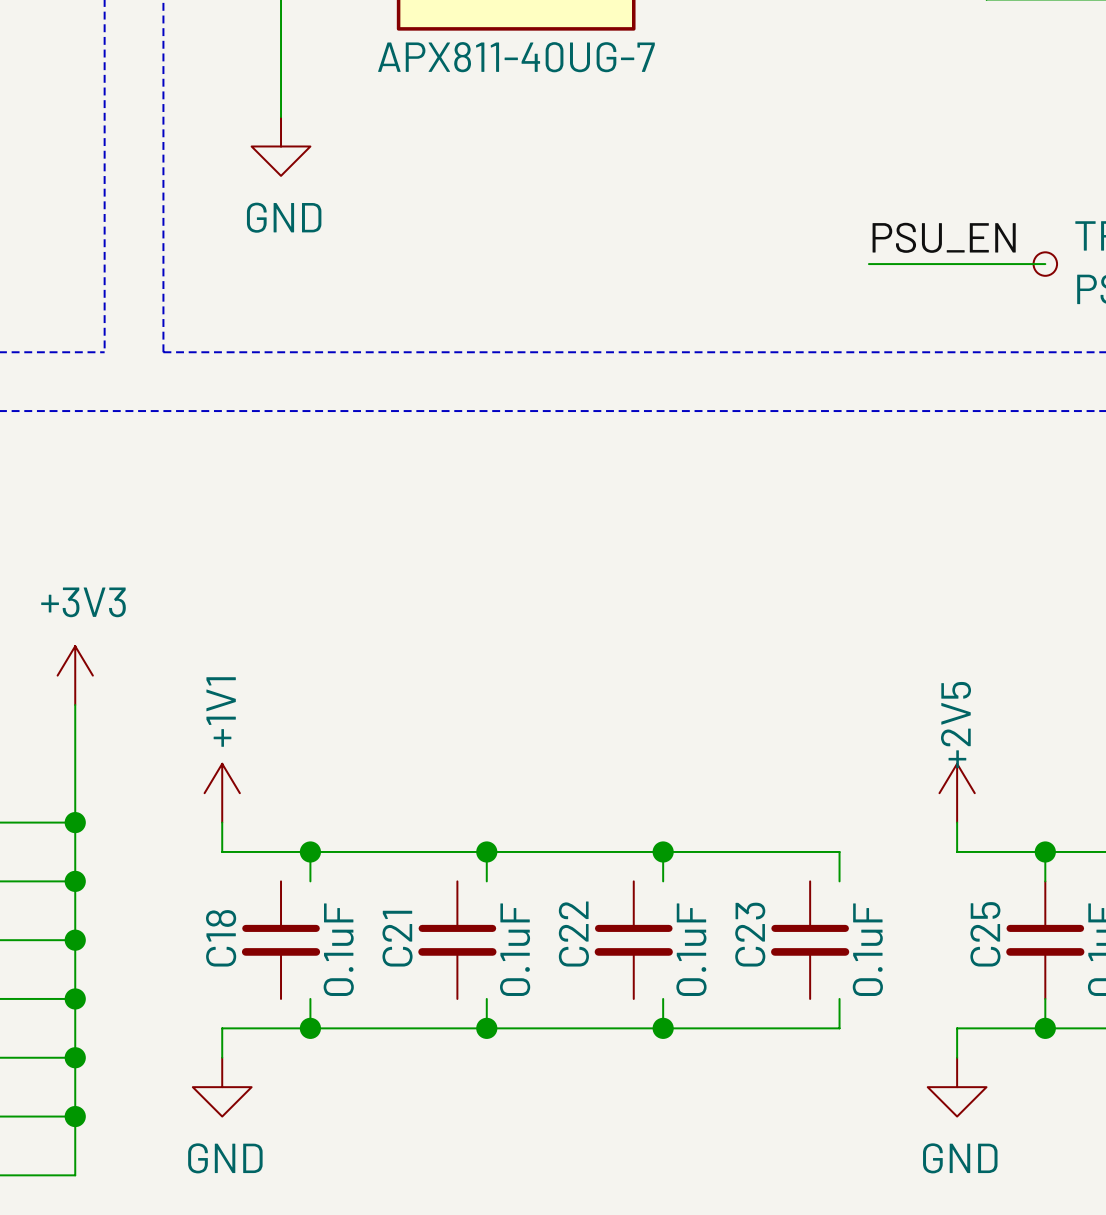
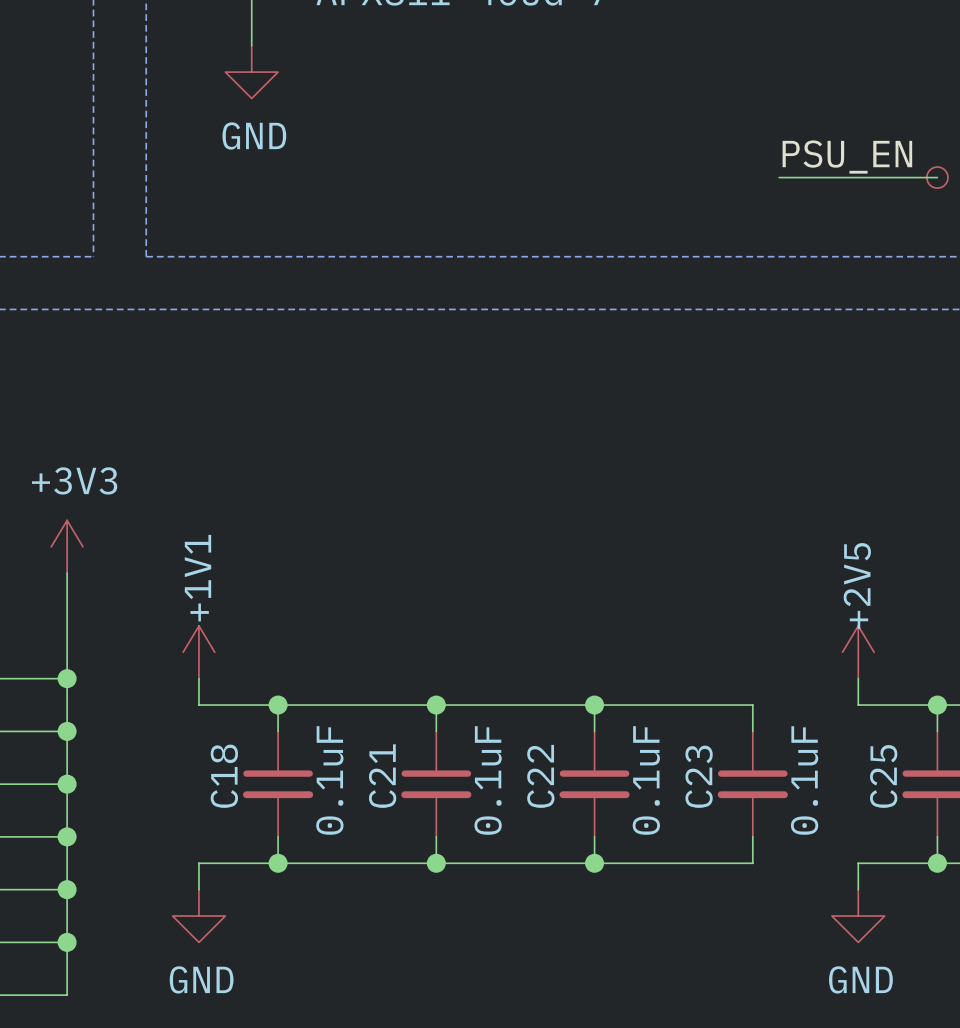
C18 position: (281, 940) -> (278, 784)
C21 position: (457, 940) -> (436, 784)
C22 position: (633, 940) -> (594, 784)
C23 position: (810, 940) -> (752, 784)

